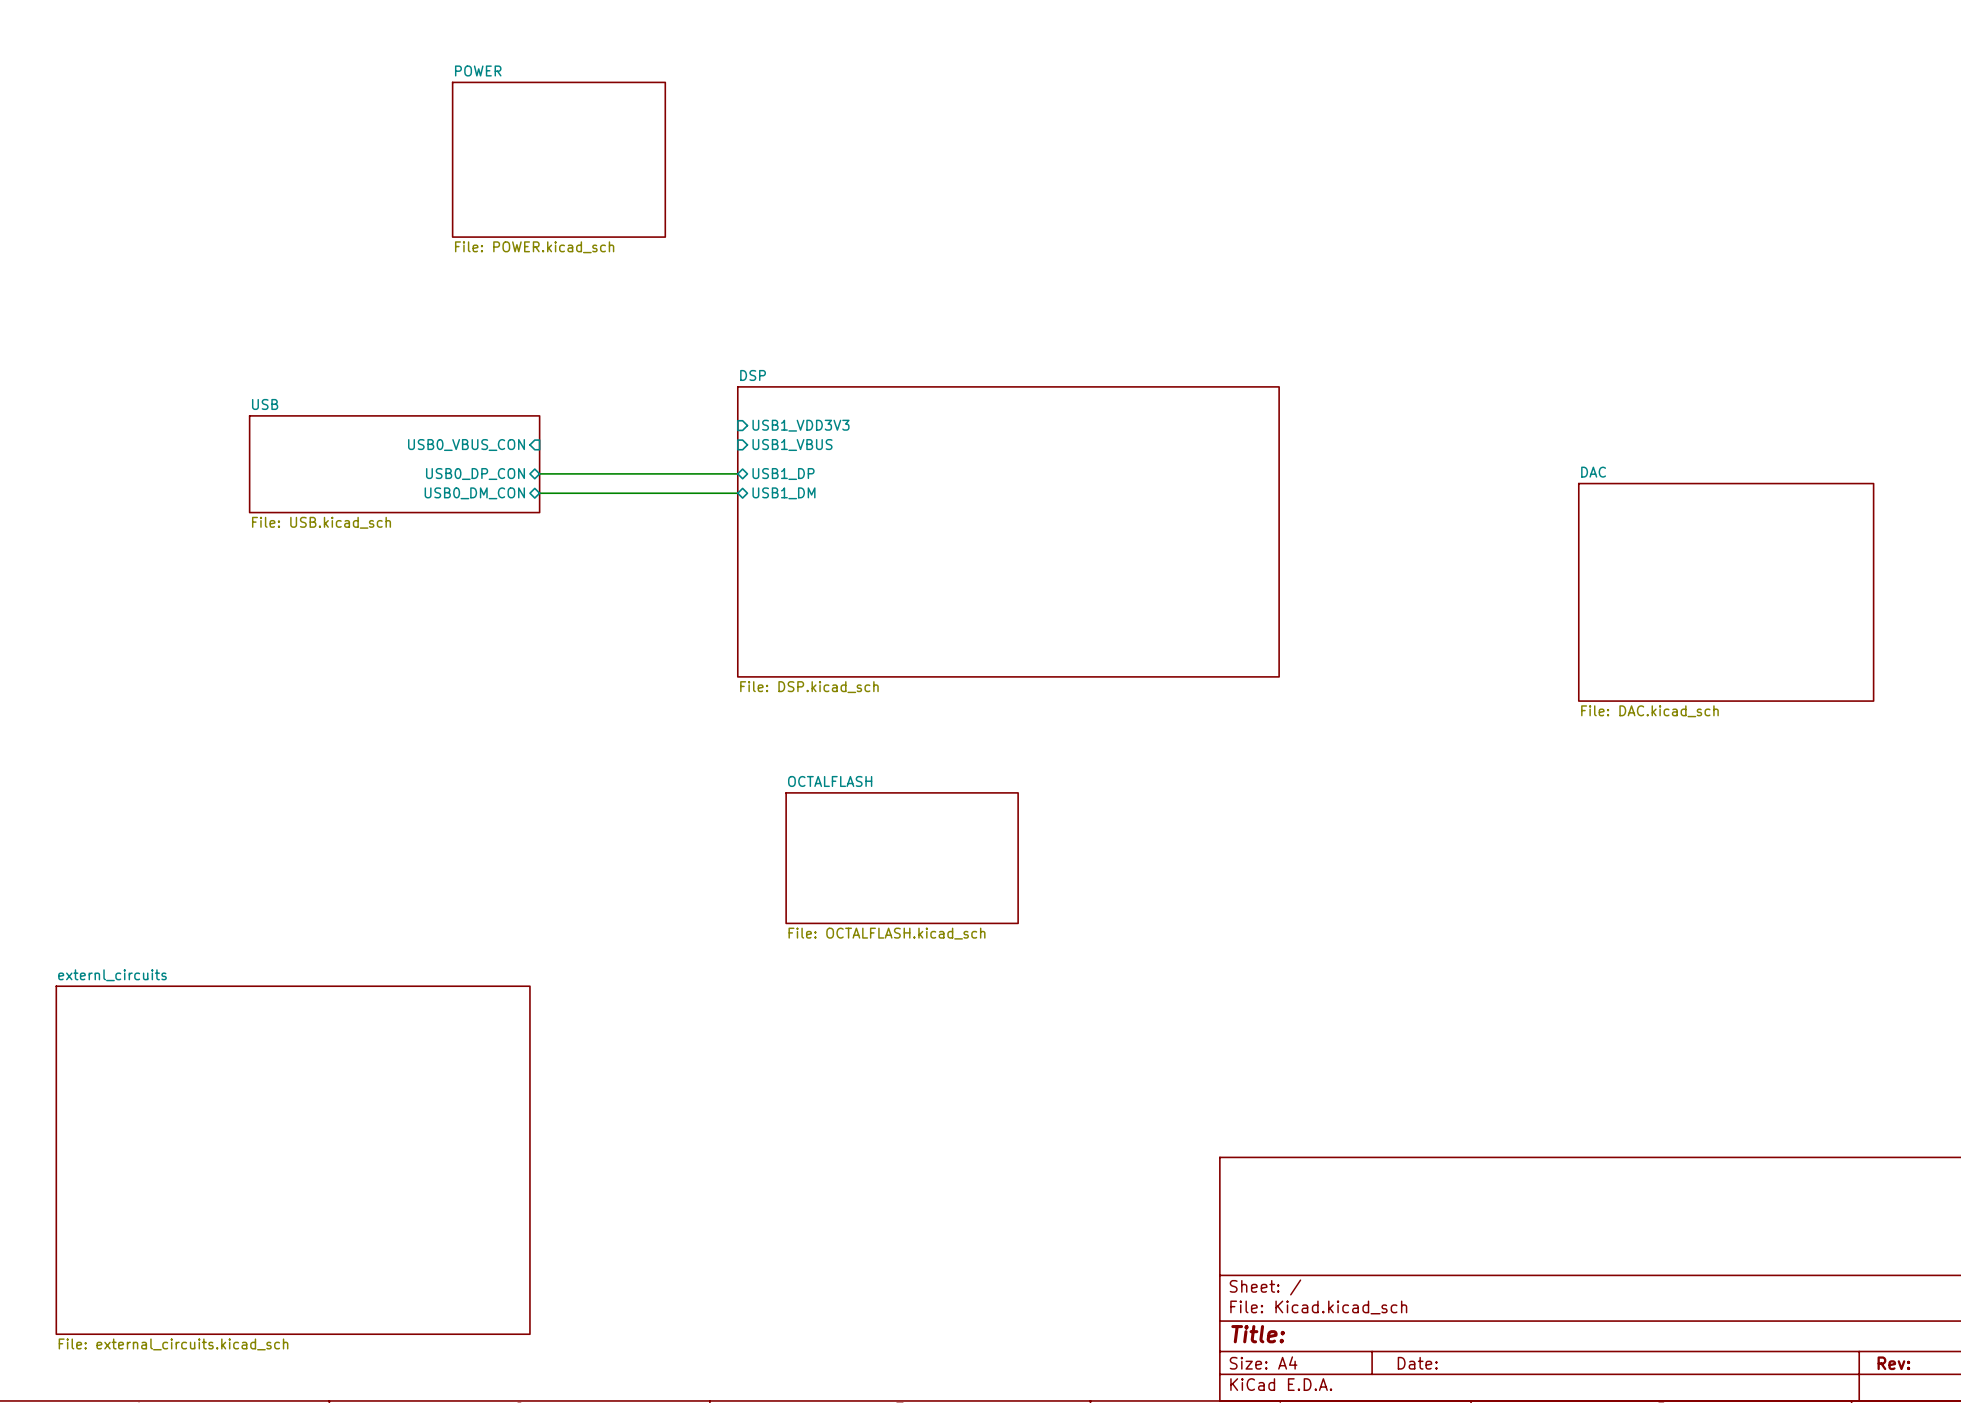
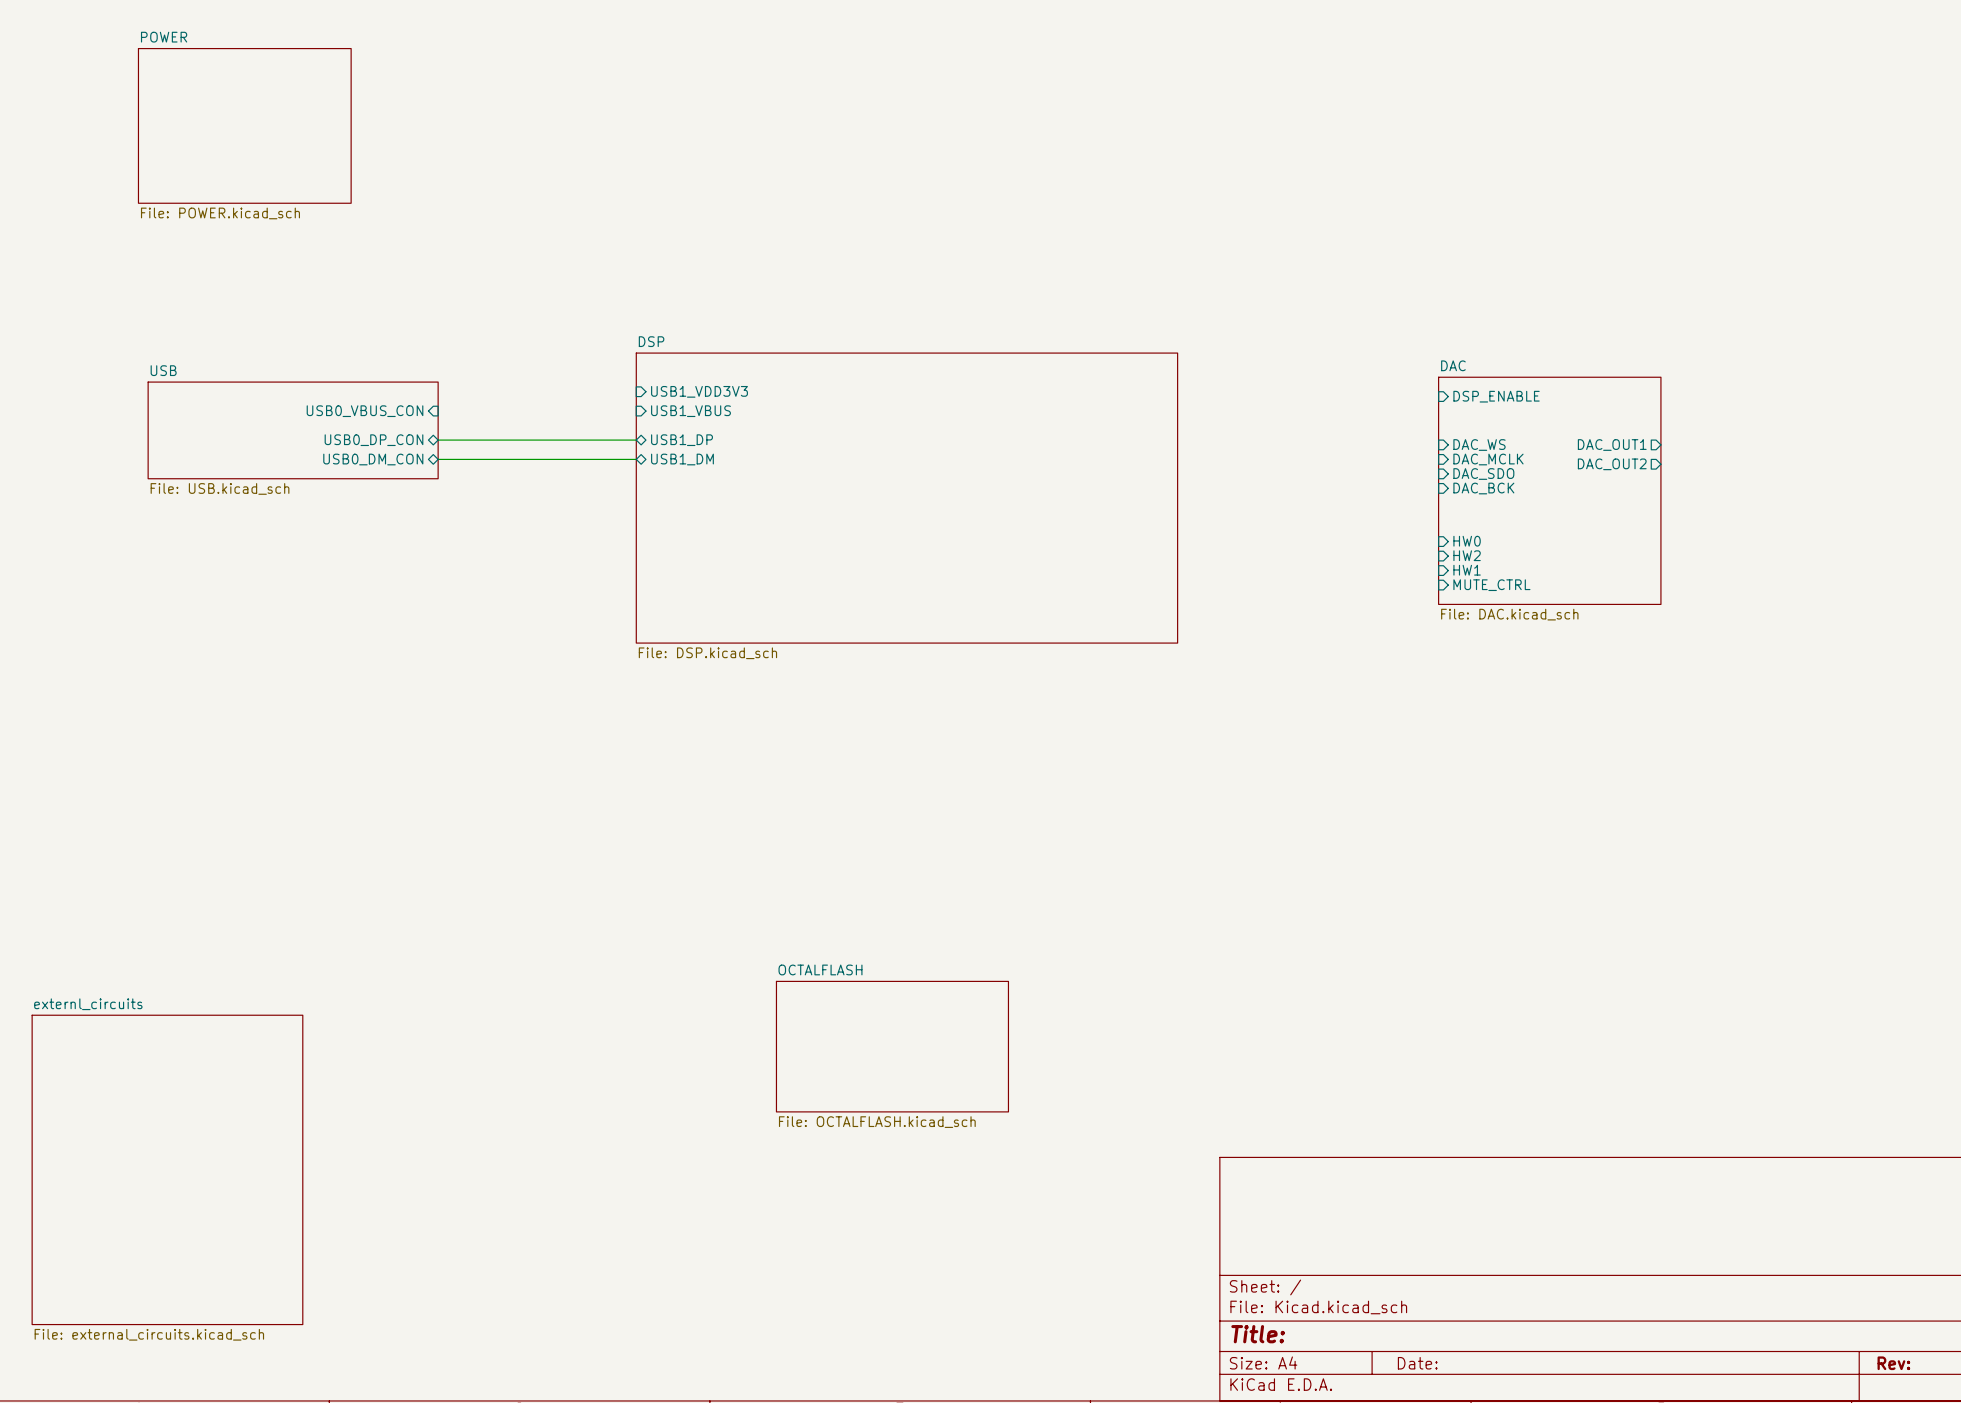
sheet POWER: none -> File: POWER.kicad_sch (244, 125)
sheet POWER: File: POWER.kicad_sch (558, 159) -> none
sheet pin: none -> DSP_ENABLE (1496, 396)
sheet pin position: USB1_VDD3V3 (801, 425) -> USB1_VDD3V3 (699, 391)
sheet pin position: USB0_VBUS_CON (466, 445) -> USB0_VBUS_CON (365, 411)
sheet pin position: USB1_VBUS (792, 445) -> USB1_VBUS (690, 411)
sheet pin: none -> DAC_WS (1479, 445)
sheet pin: none -> DAC_OUT1 (1612, 445)
sheet pin: none -> DAC_MCLK (1488, 459)
sheet USB position: (394, 464) -> (293, 430)
sheet pin: none -> DAC_OUT2 (1612, 464)
wire: (539, 473) (737, 473) -> (438, 440) (636, 440)
sheet pin position: USB0_DP_CON (475, 474) -> USB0_DP_CON (373, 440)
sheet pin position: USB1_DP (783, 474) -> USB1_DP (682, 440)
sheet pin: none -> DAC_SDO (1483, 474)
sheet pin: none -> DAC_BCK (1483, 488)
sheet DAC: none -> File: DAC.kicad_sch (1549, 490)
sheet pin position: USB0_DM_CON (474, 493) -> USB0_DM_CON (373, 459)
wire: (539, 493) (737, 493) -> (438, 459) (636, 459)
sheet pin position: USB1_DM (783, 493) -> USB1_DM (682, 459)
sheet DSP position: (1008, 531) -> (906, 498)
sheet pin: none -> HW0 (1467, 541)
sheet pin: none -> HW2 (1467, 555)
sheet pin: none -> HW1 (1467, 570)
sheet pin: none -> MUTE_CTRL (1491, 585)
sheet DAC: File: DAC.kicad_sch (1726, 592) -> none
sheet OCTALFLASH position: (902, 858) -> (892, 1046)
sheet externl_circuits: File: external_circuits.kicad_sch (293, 1160) -> none
sheet externl_circuits: none -> File: external_circuits.kicad_sch (167, 1169)

